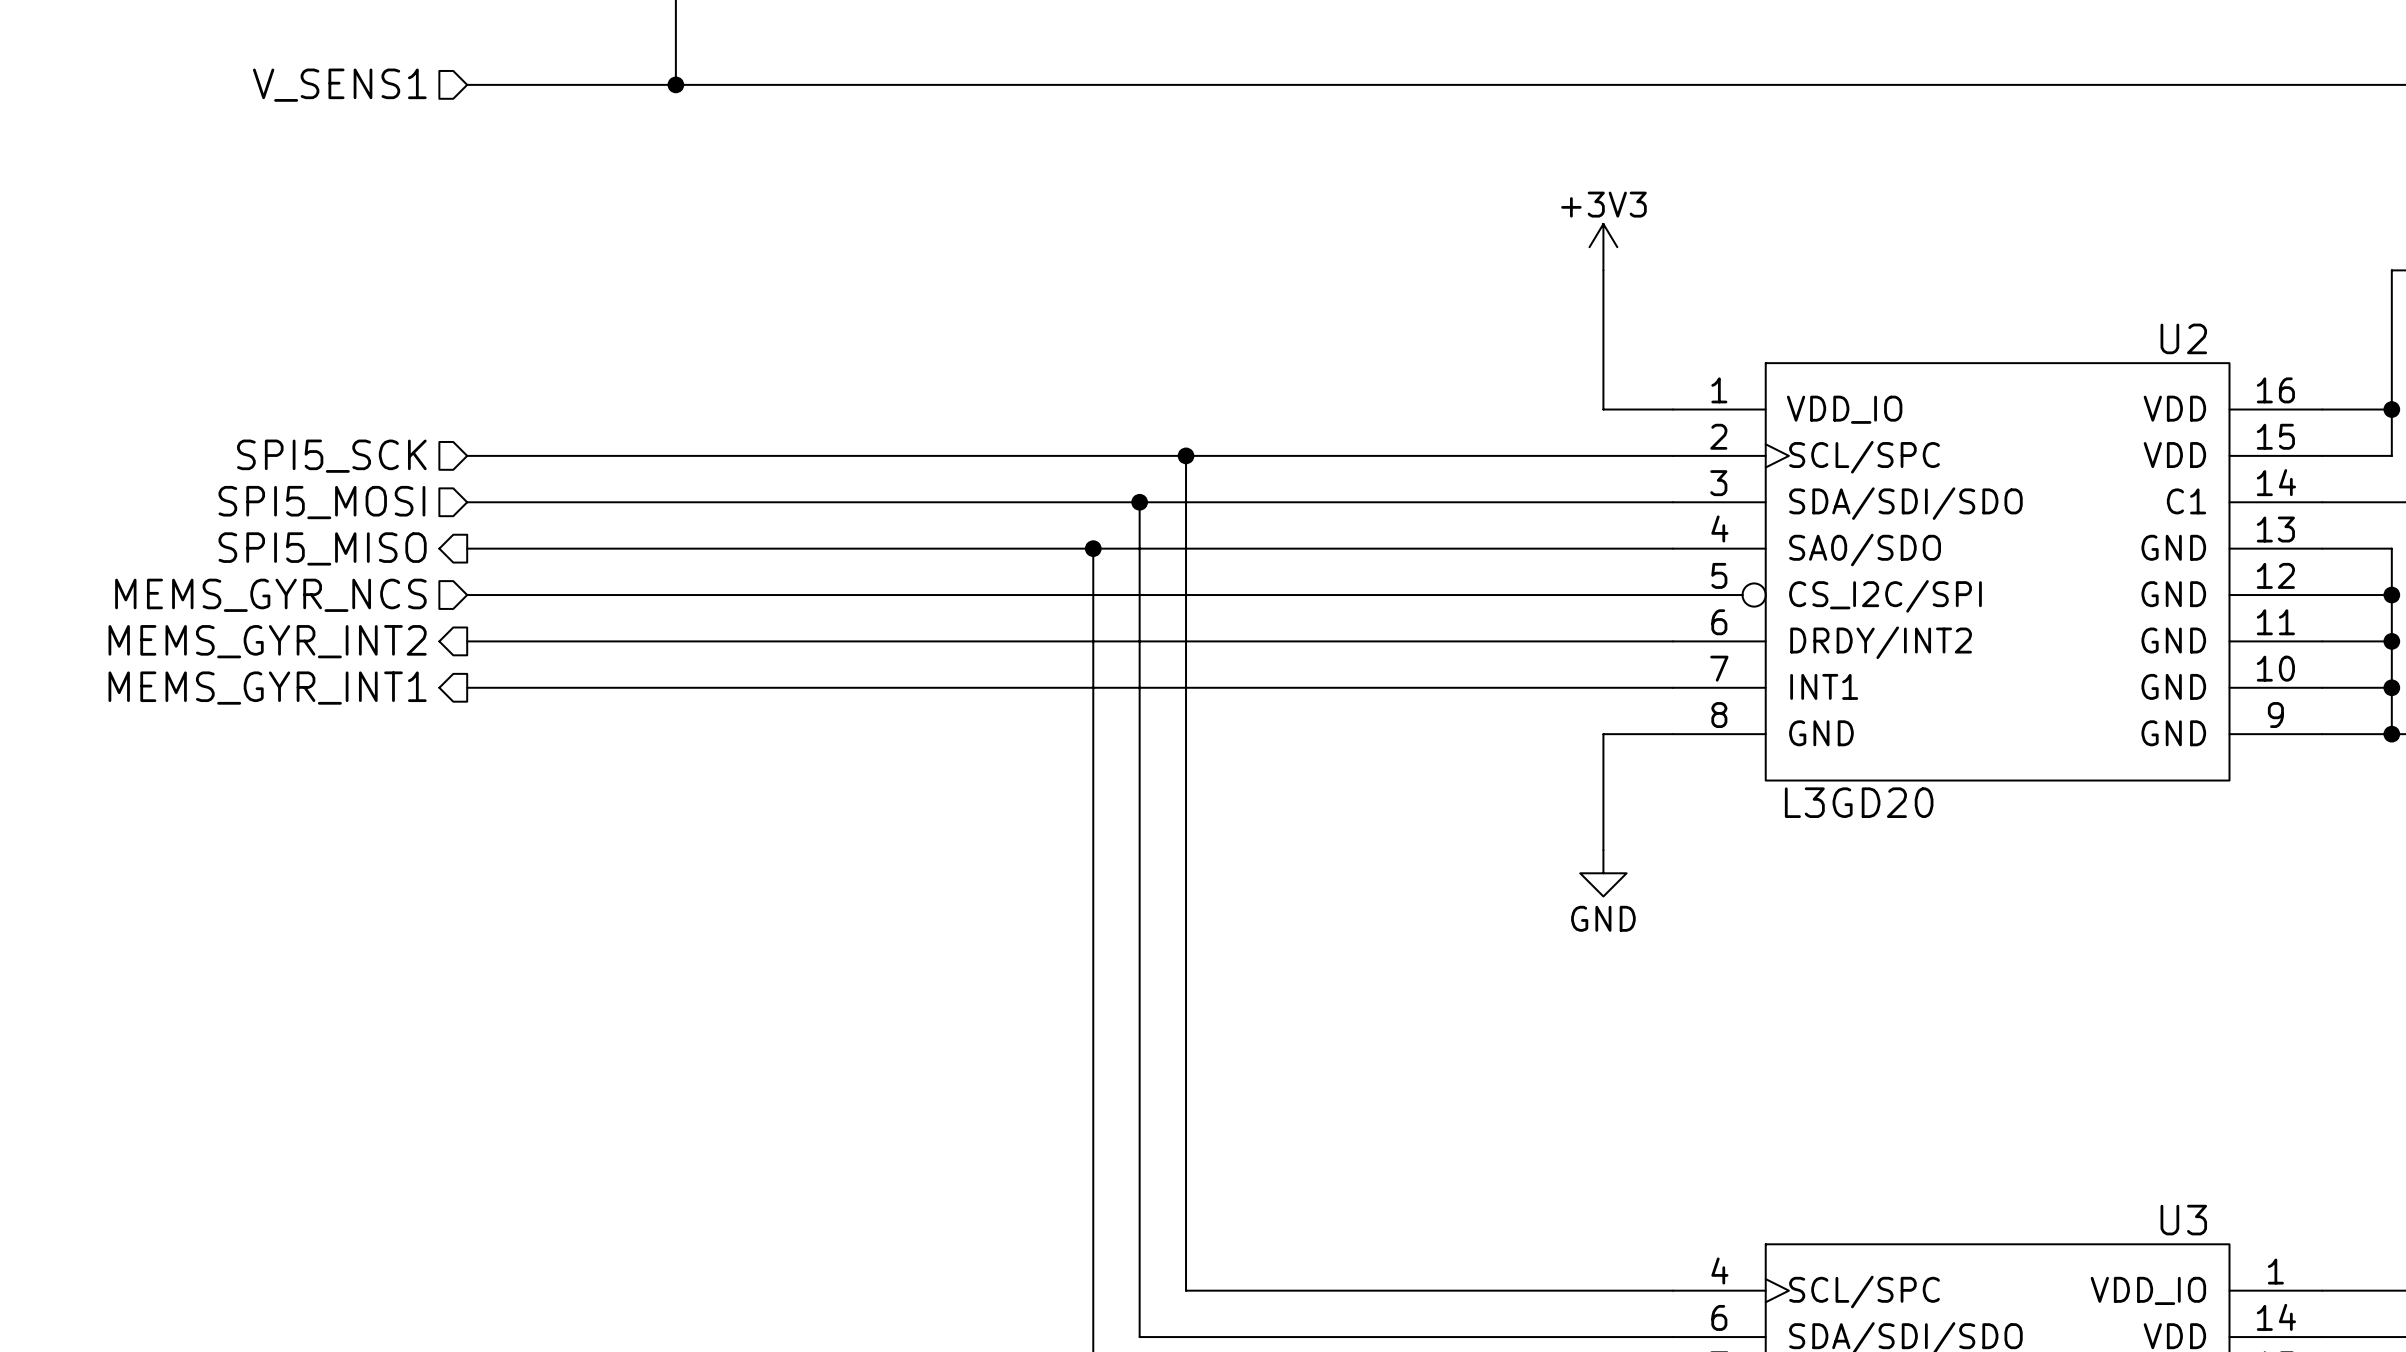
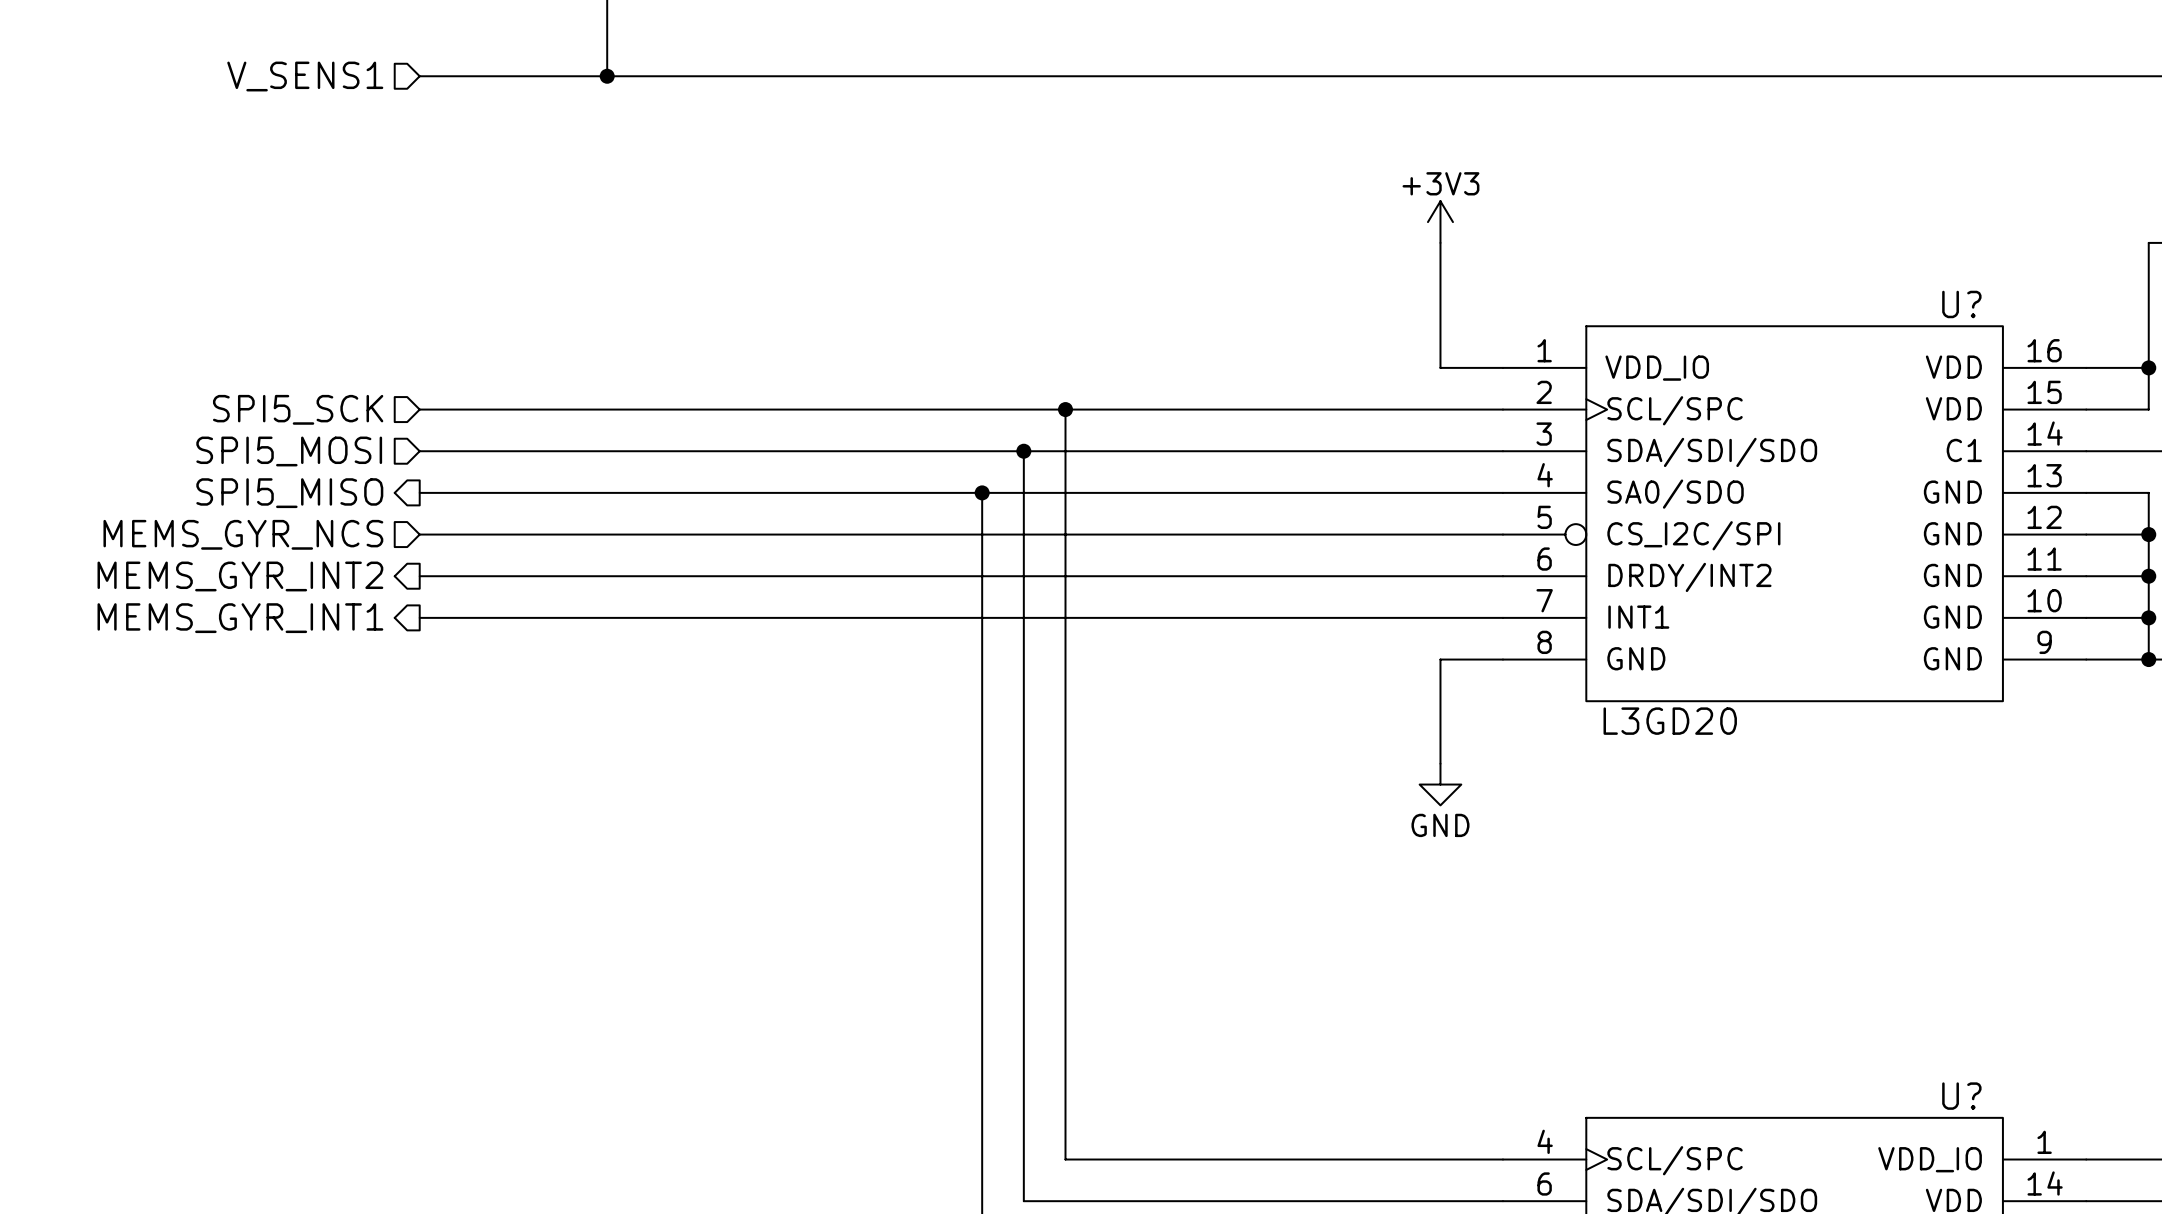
U2 name: U2 (2183, 338) -> U? (1961, 304)
U3 name: U3 (2183, 1220) -> U? (1961, 1096)

